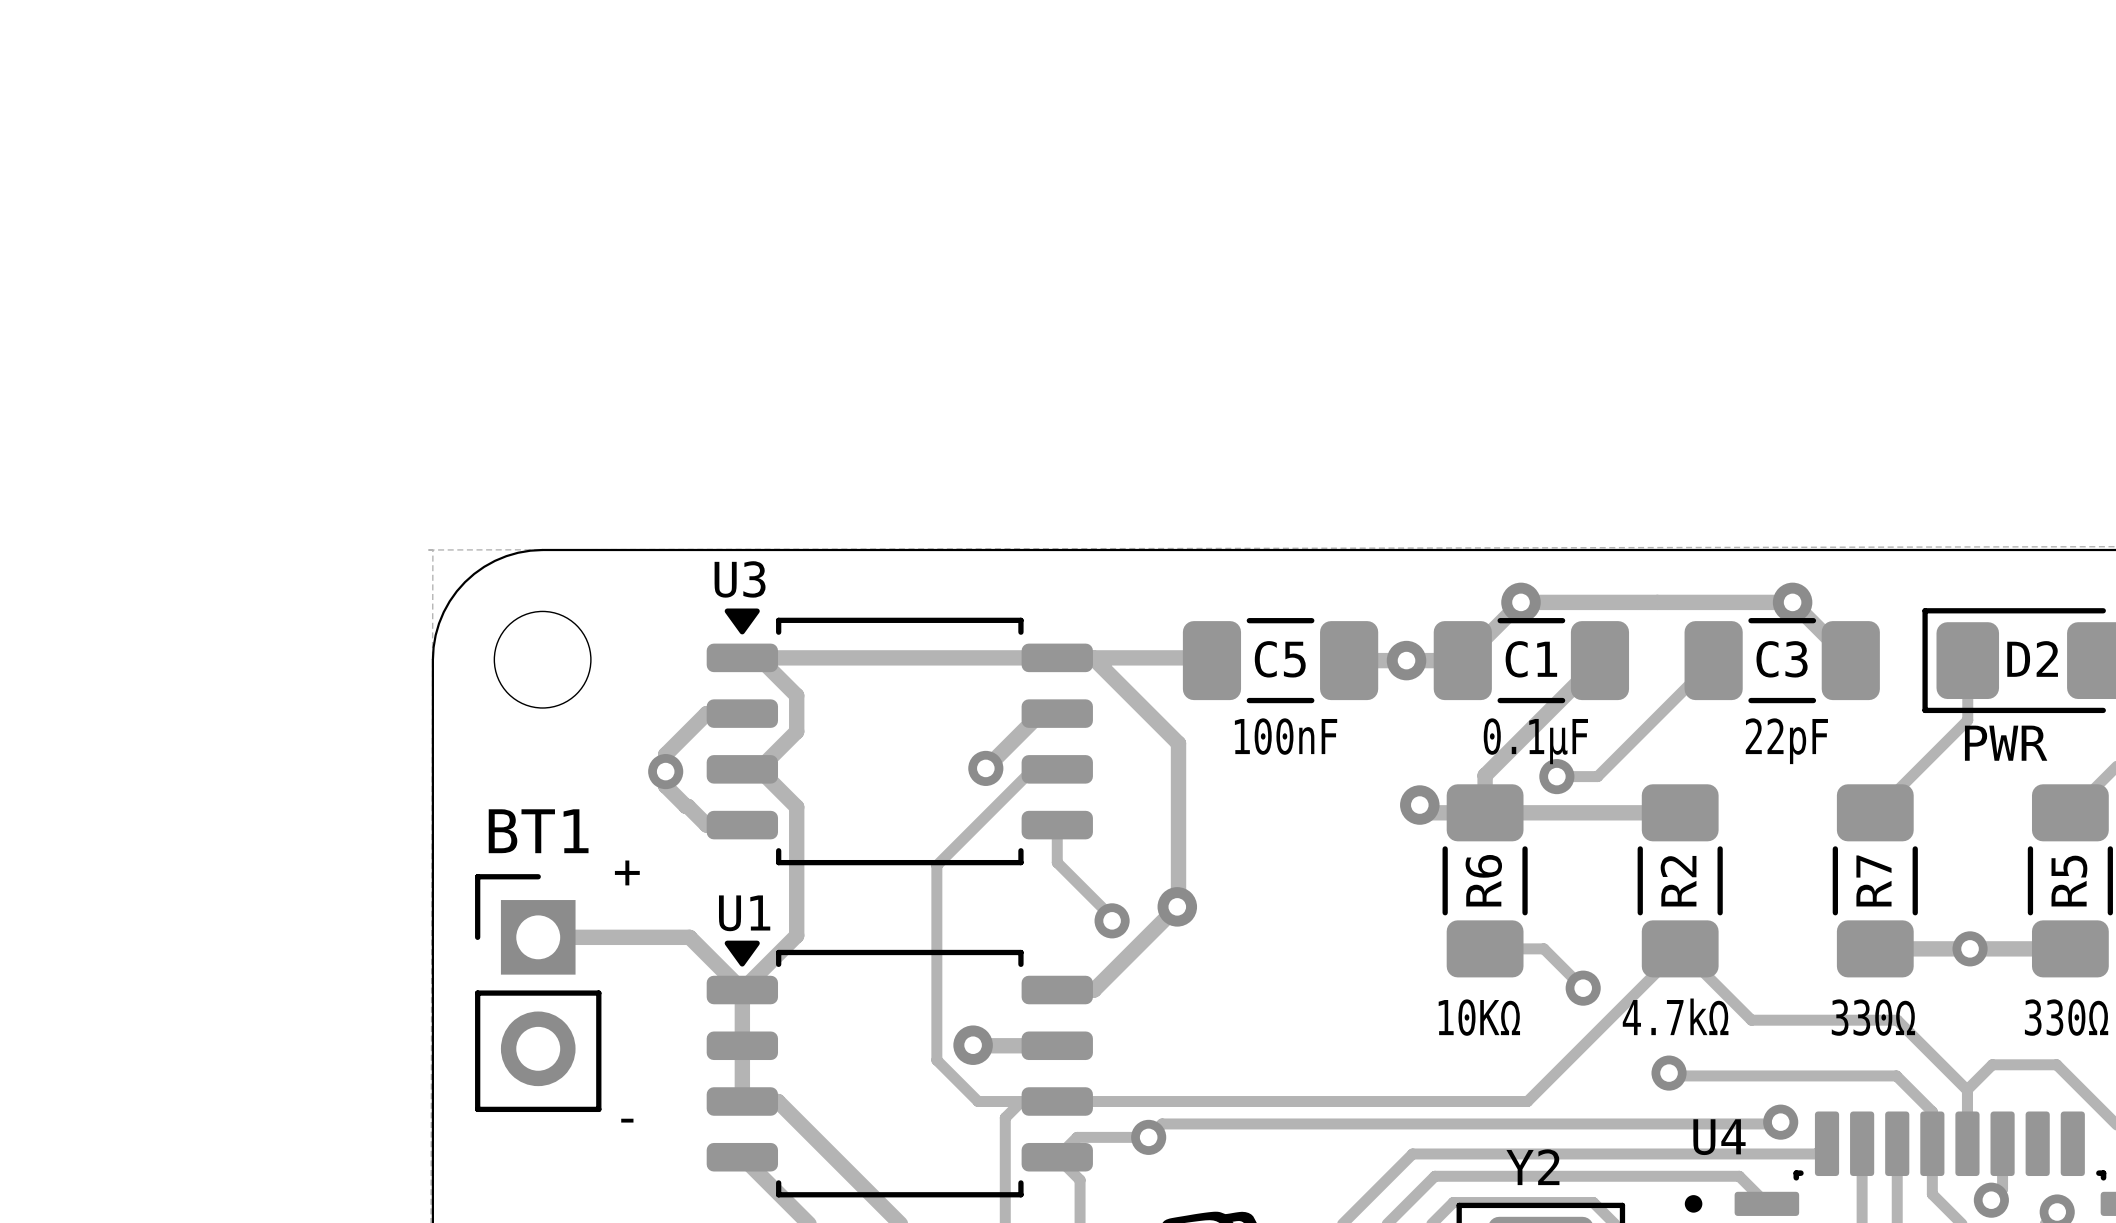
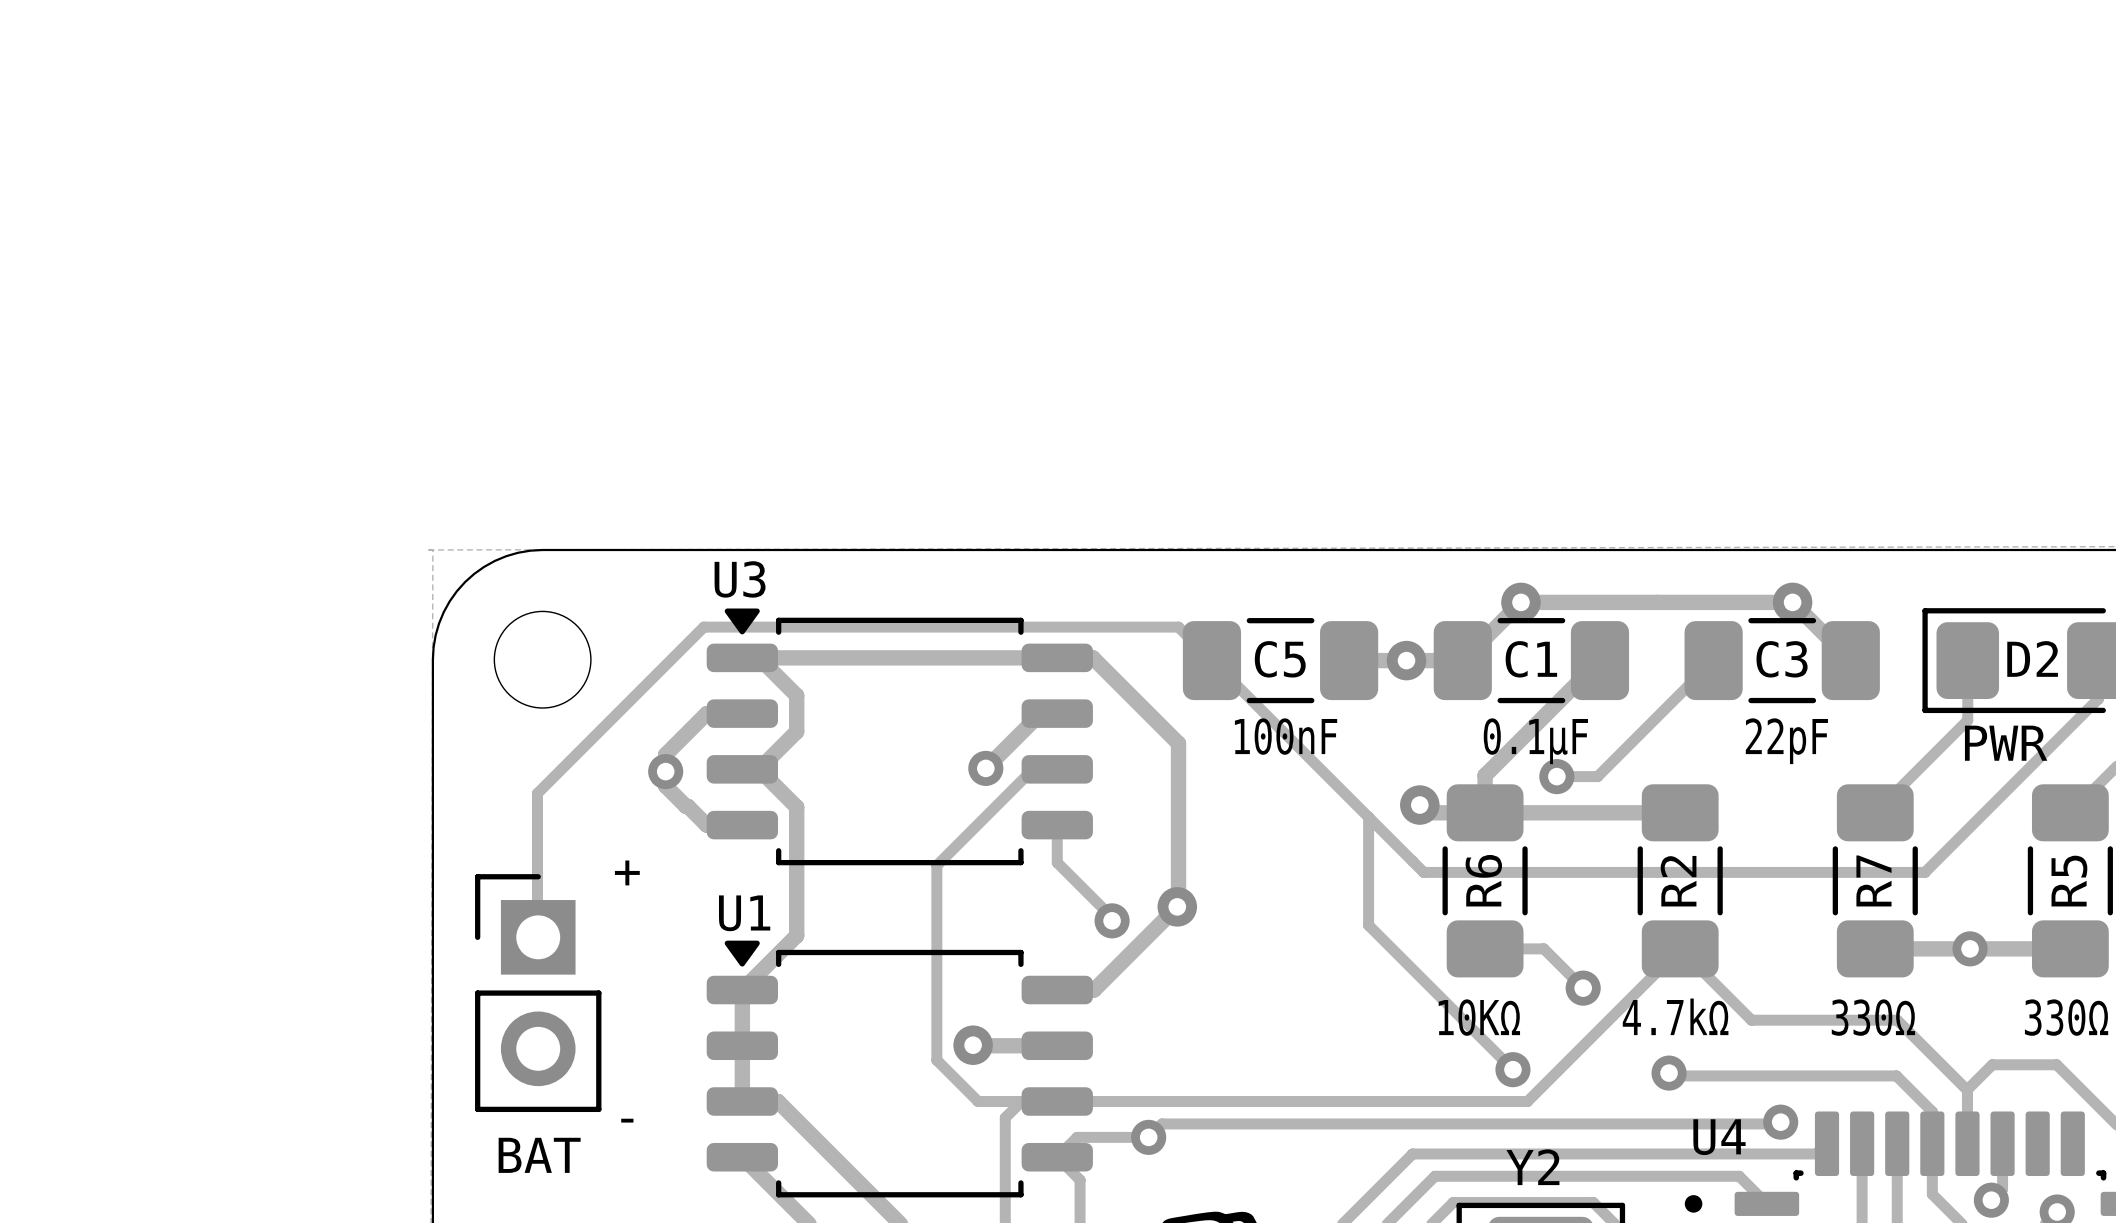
track: (1092, 657) (1209, 657) -> none
track: none -> (1211, 660) (1423, 872) (1924, 872) (2098, 699) (2098, 660)
track: none -> (1368, 817) (1368, 925) (1512, 1069)
BT1 name: BT1 (538, 831) -> BAT (539, 1155)
track: (538, 937) (689, 937) (742, 990) -> (537, 936) (537, 793) (703, 627) (1178, 627) (1209, 657)
via: none -> (1512, 1069)

